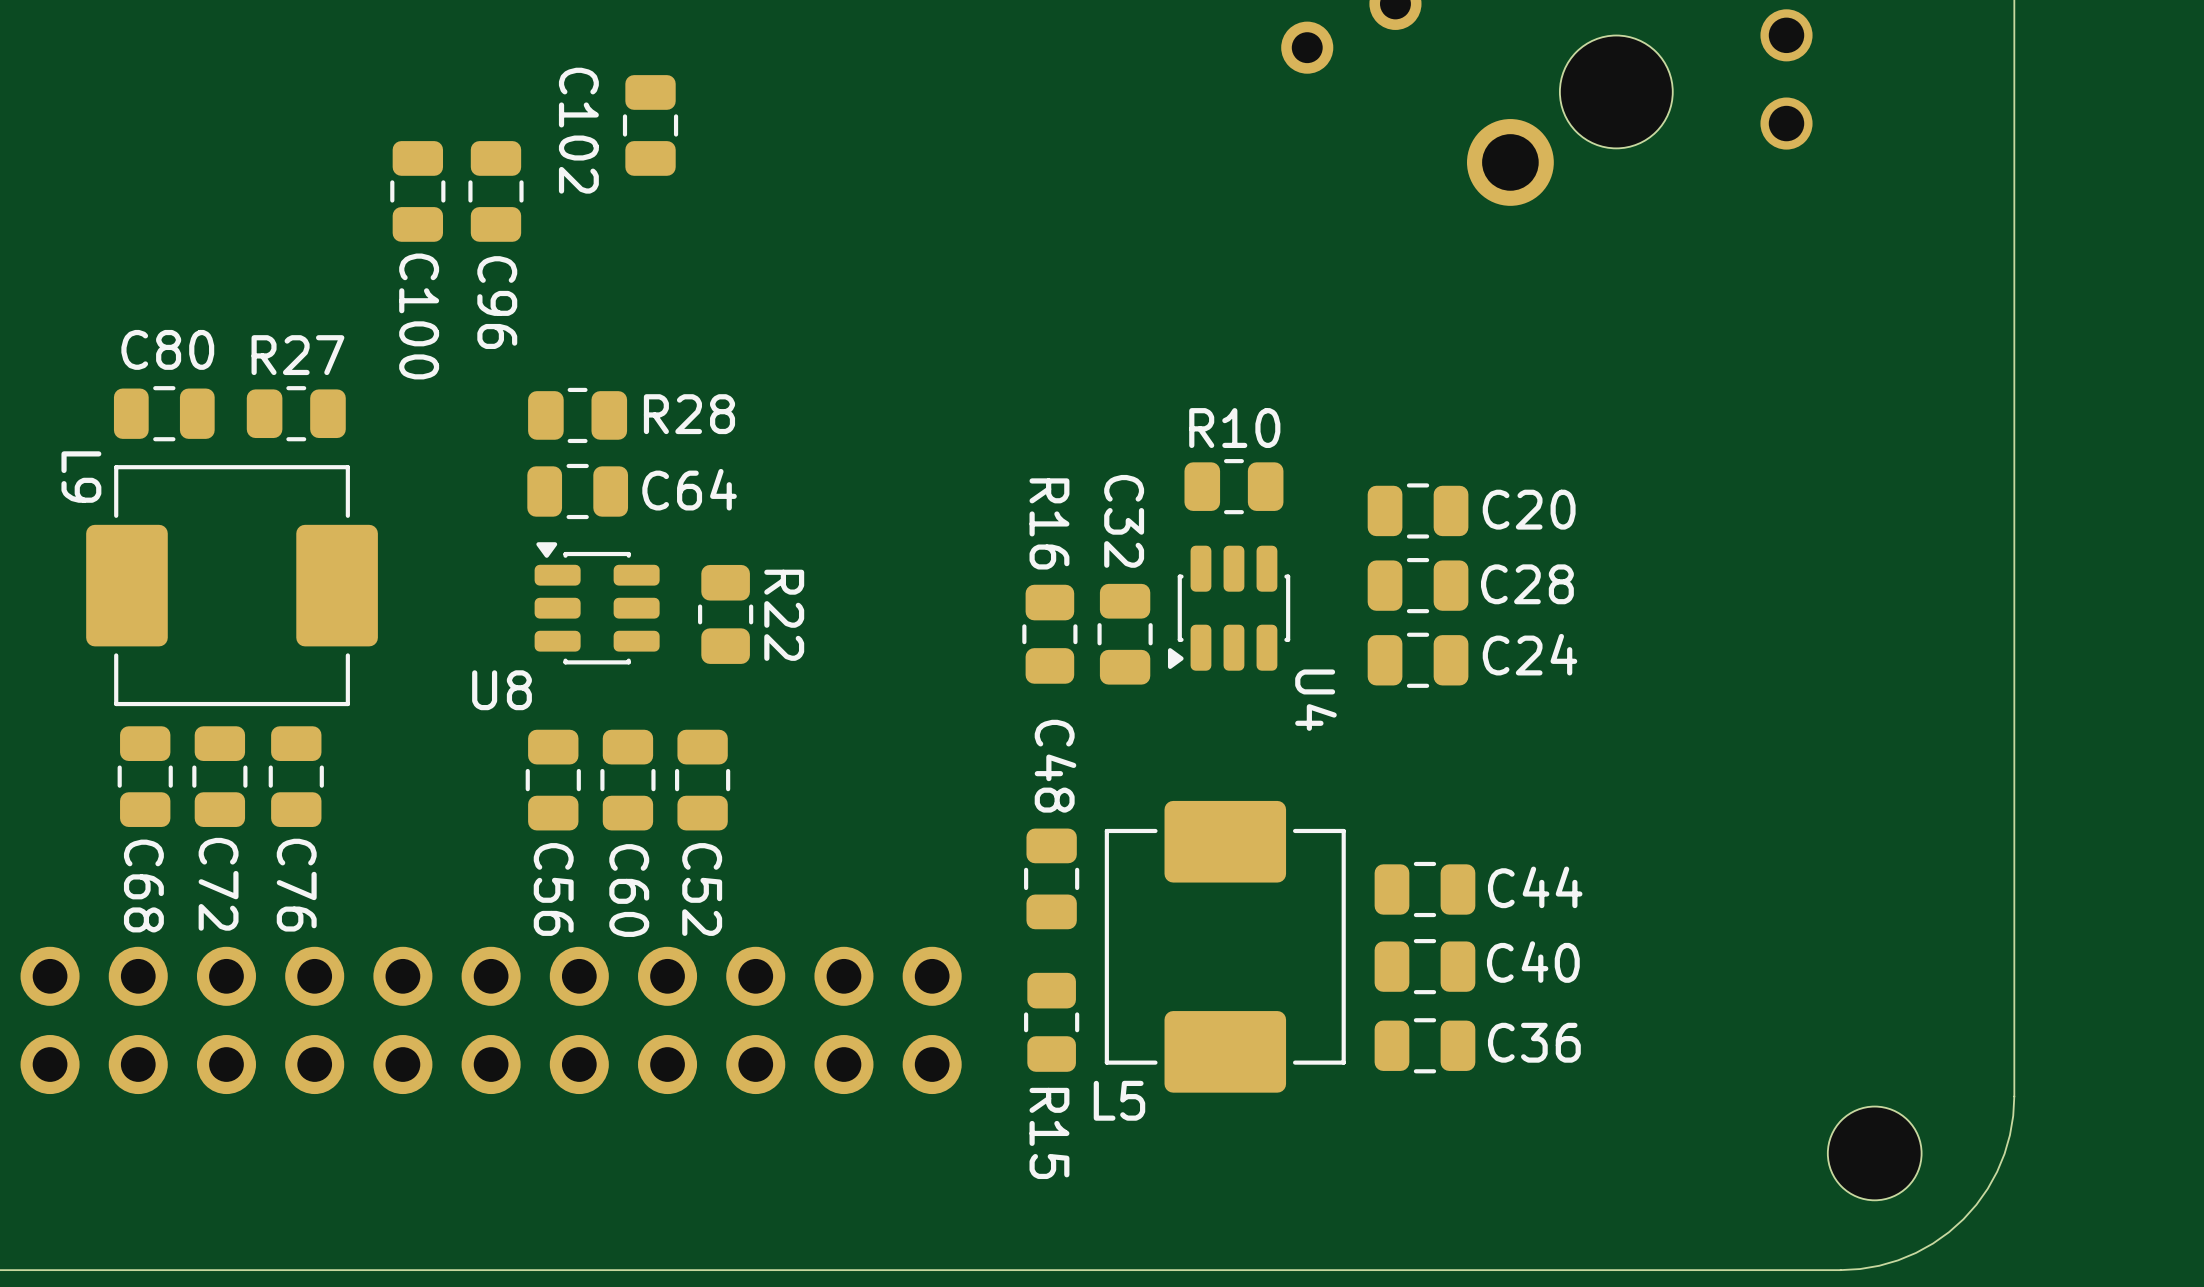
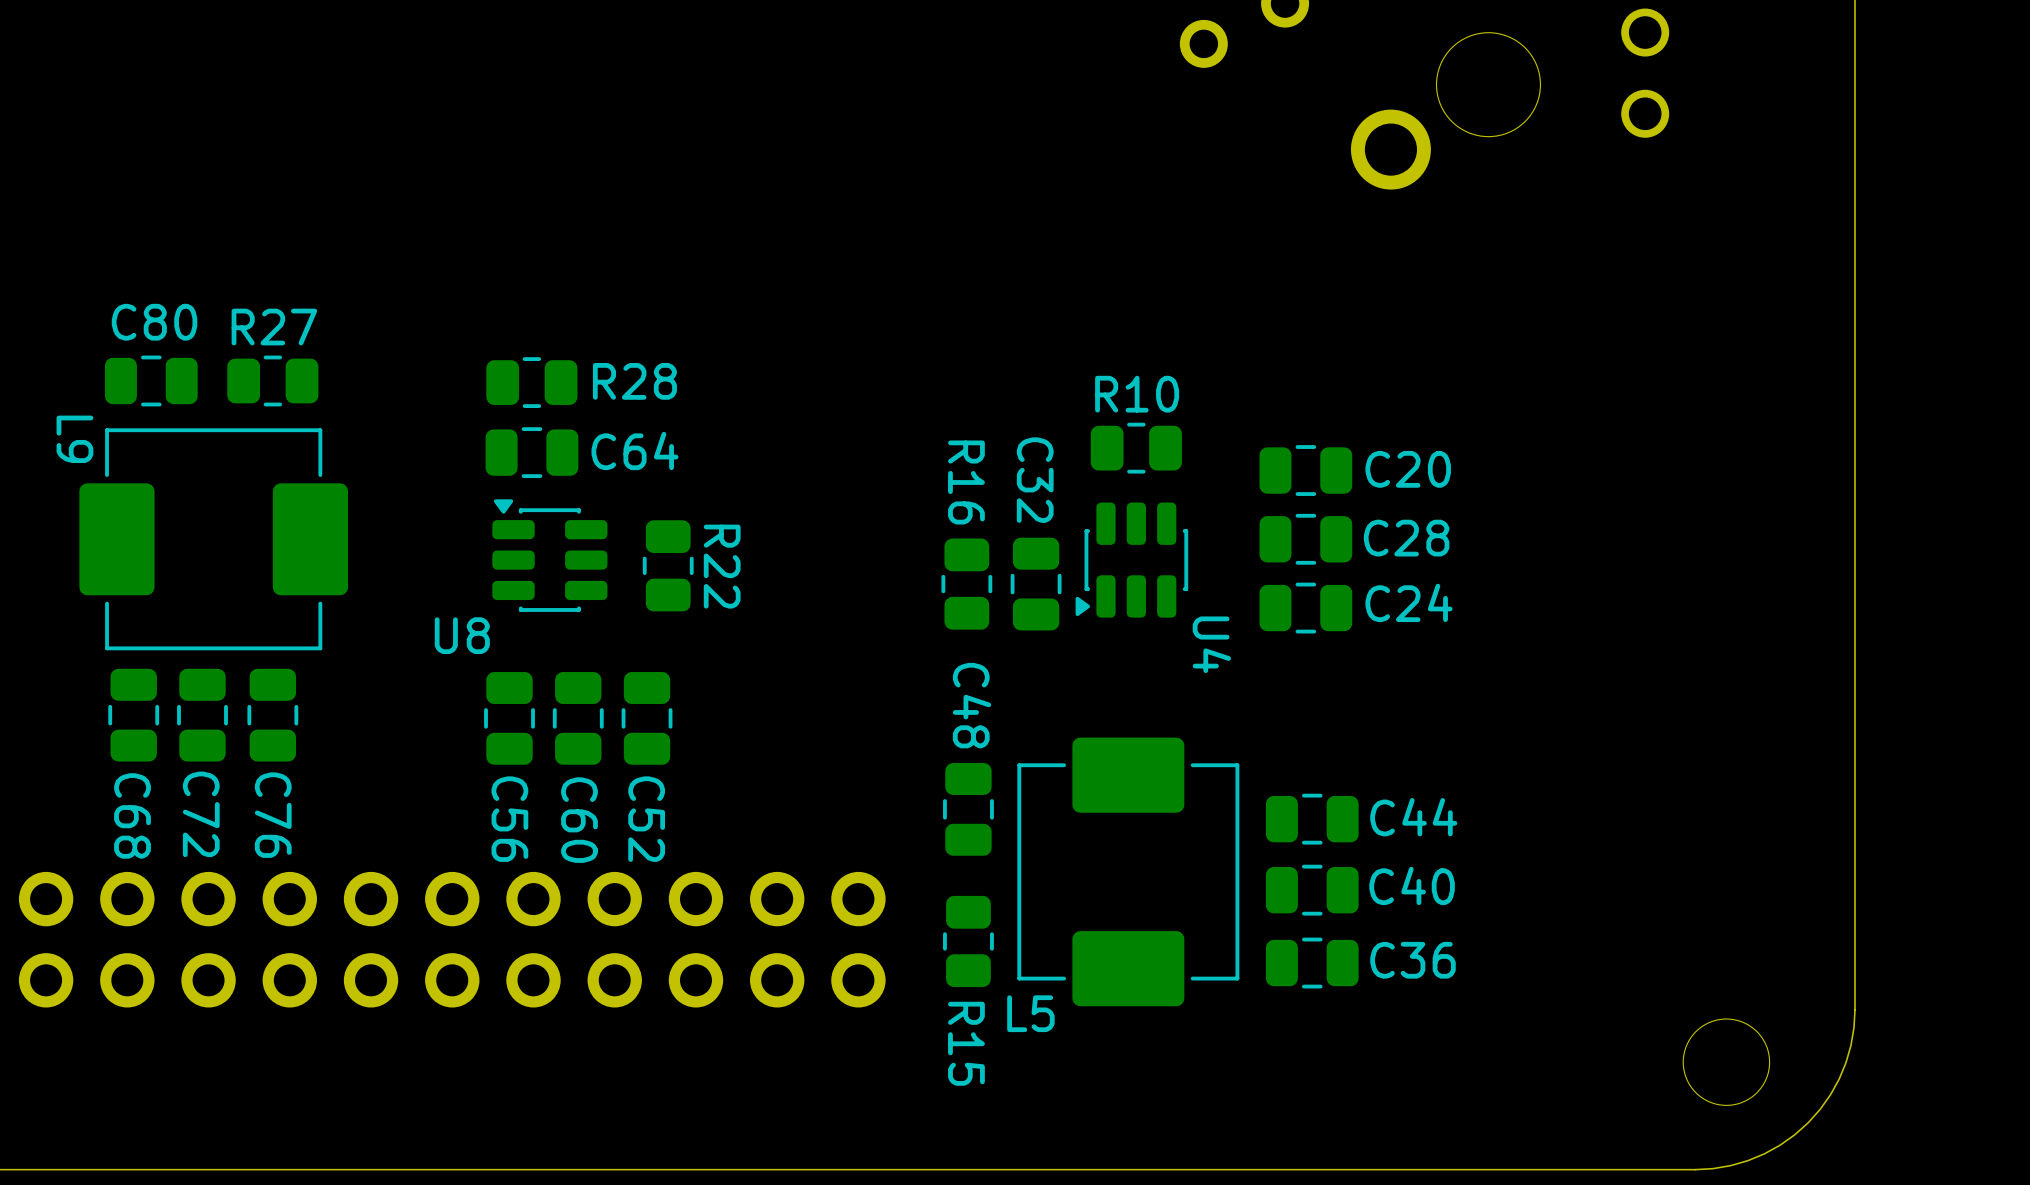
C102: (650, 125) -> none
C100: (417, 191) -> none
C96: (495, 191) -> none

